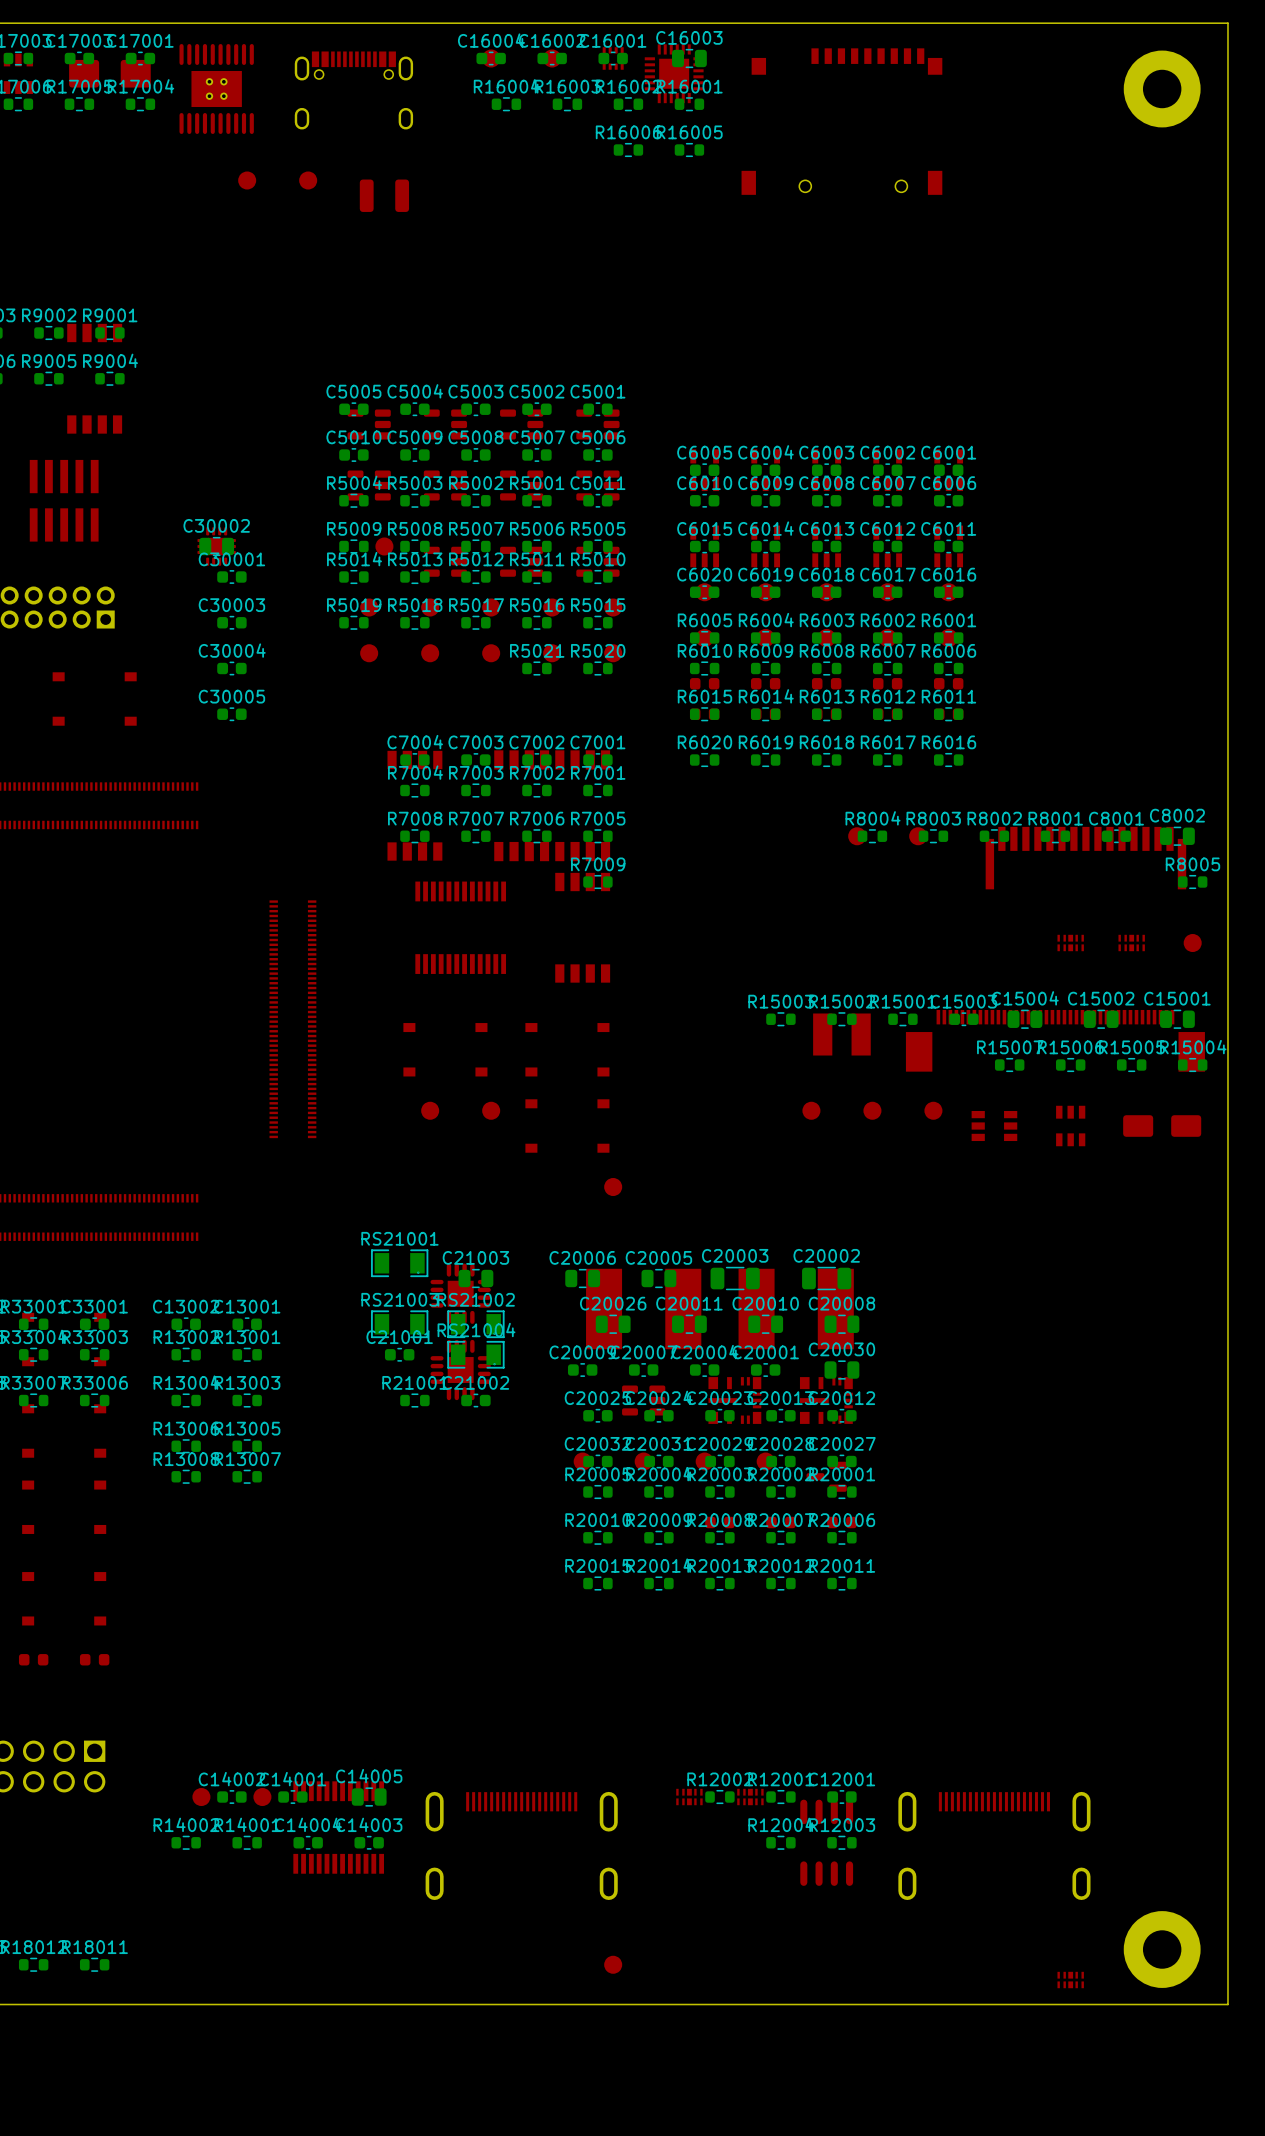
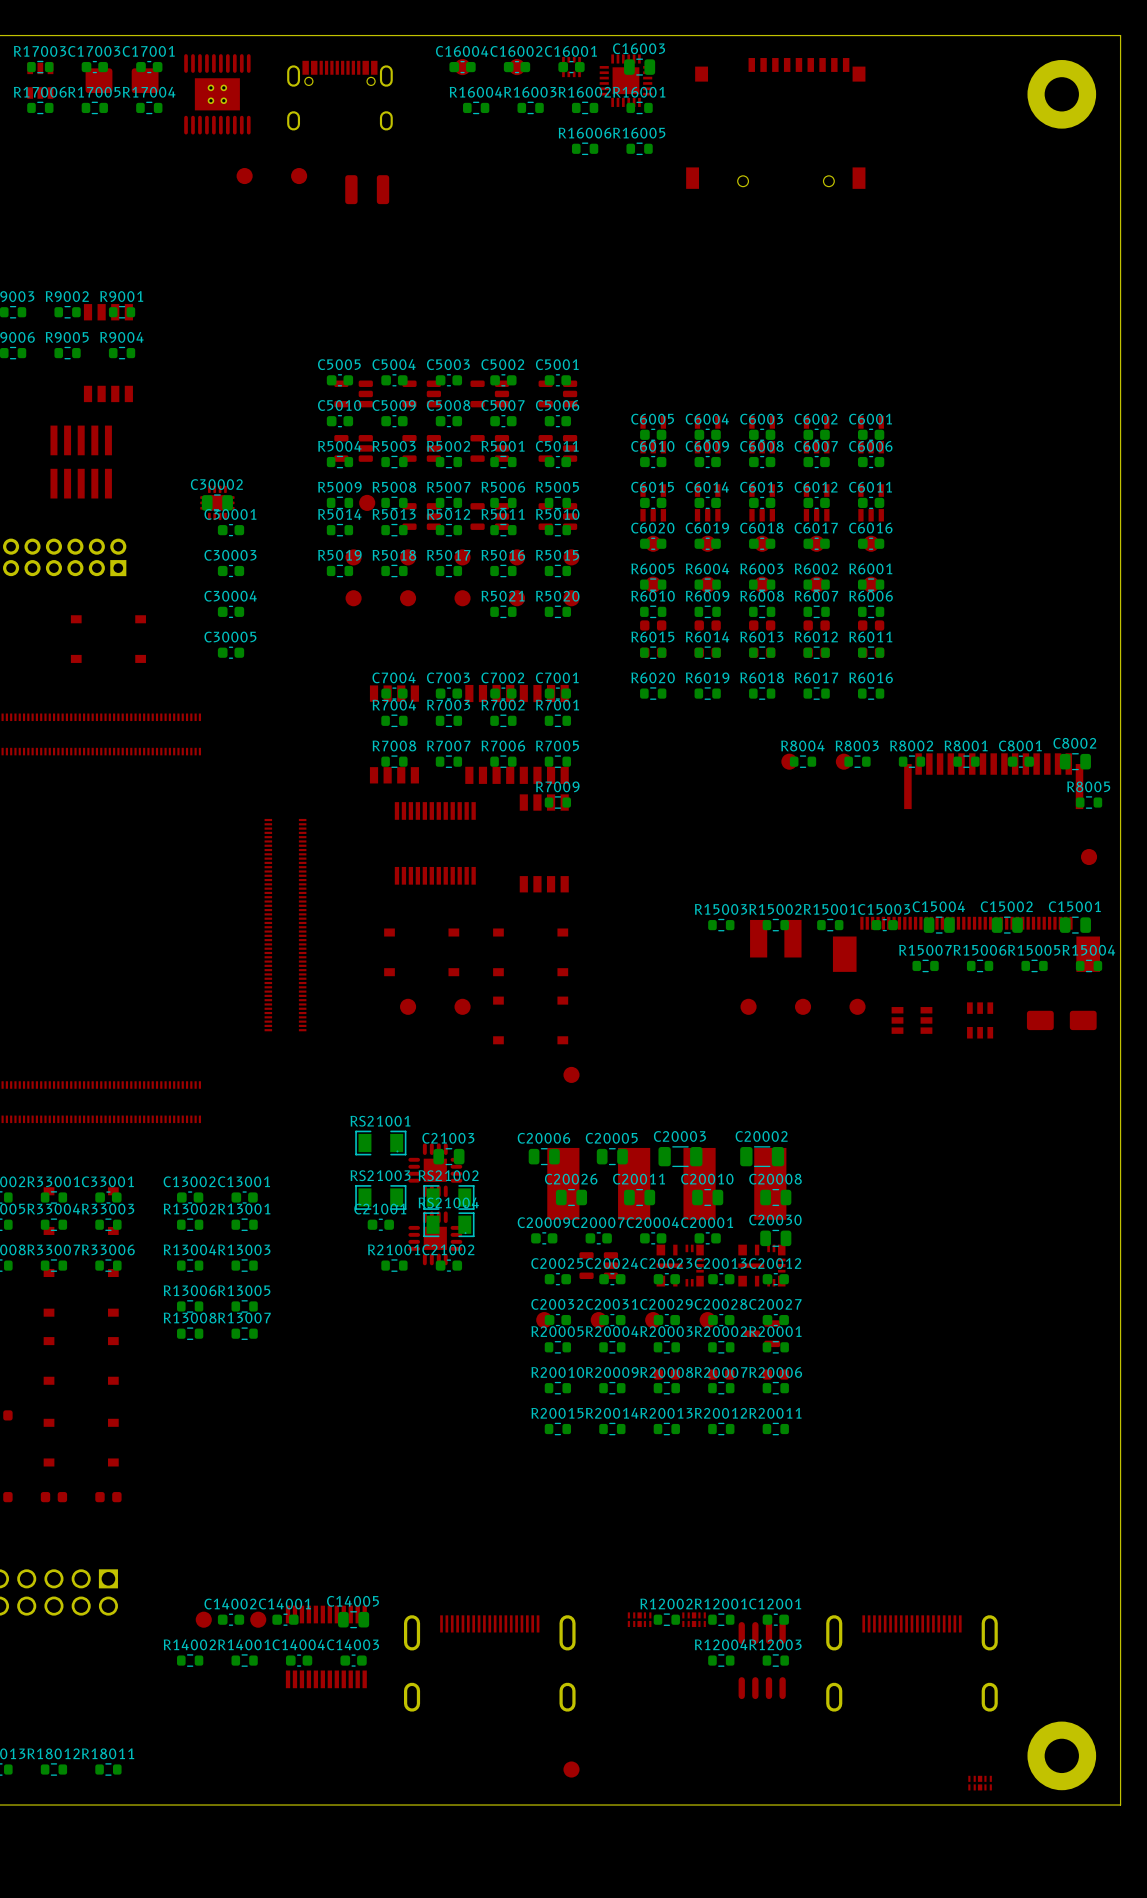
part: (1070, 943) -> none
part: (1131, 943) -> none

